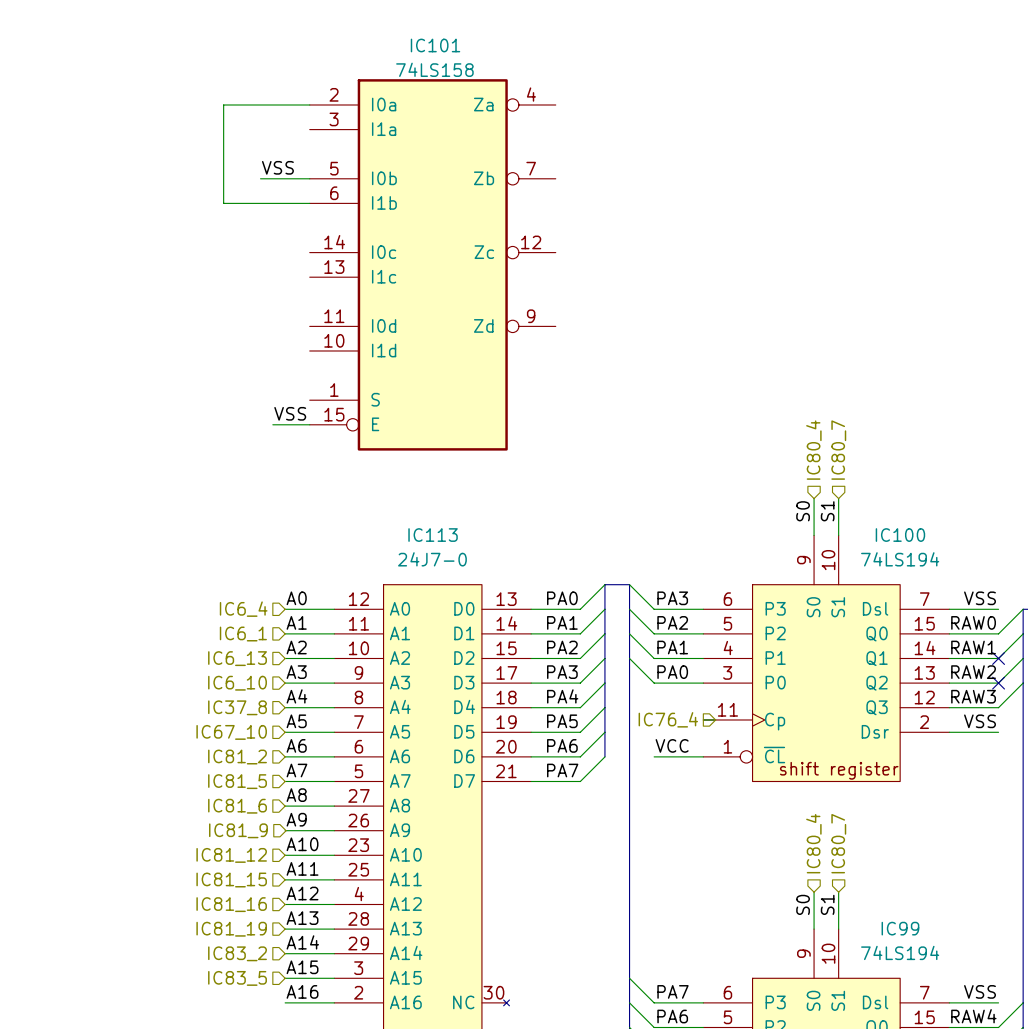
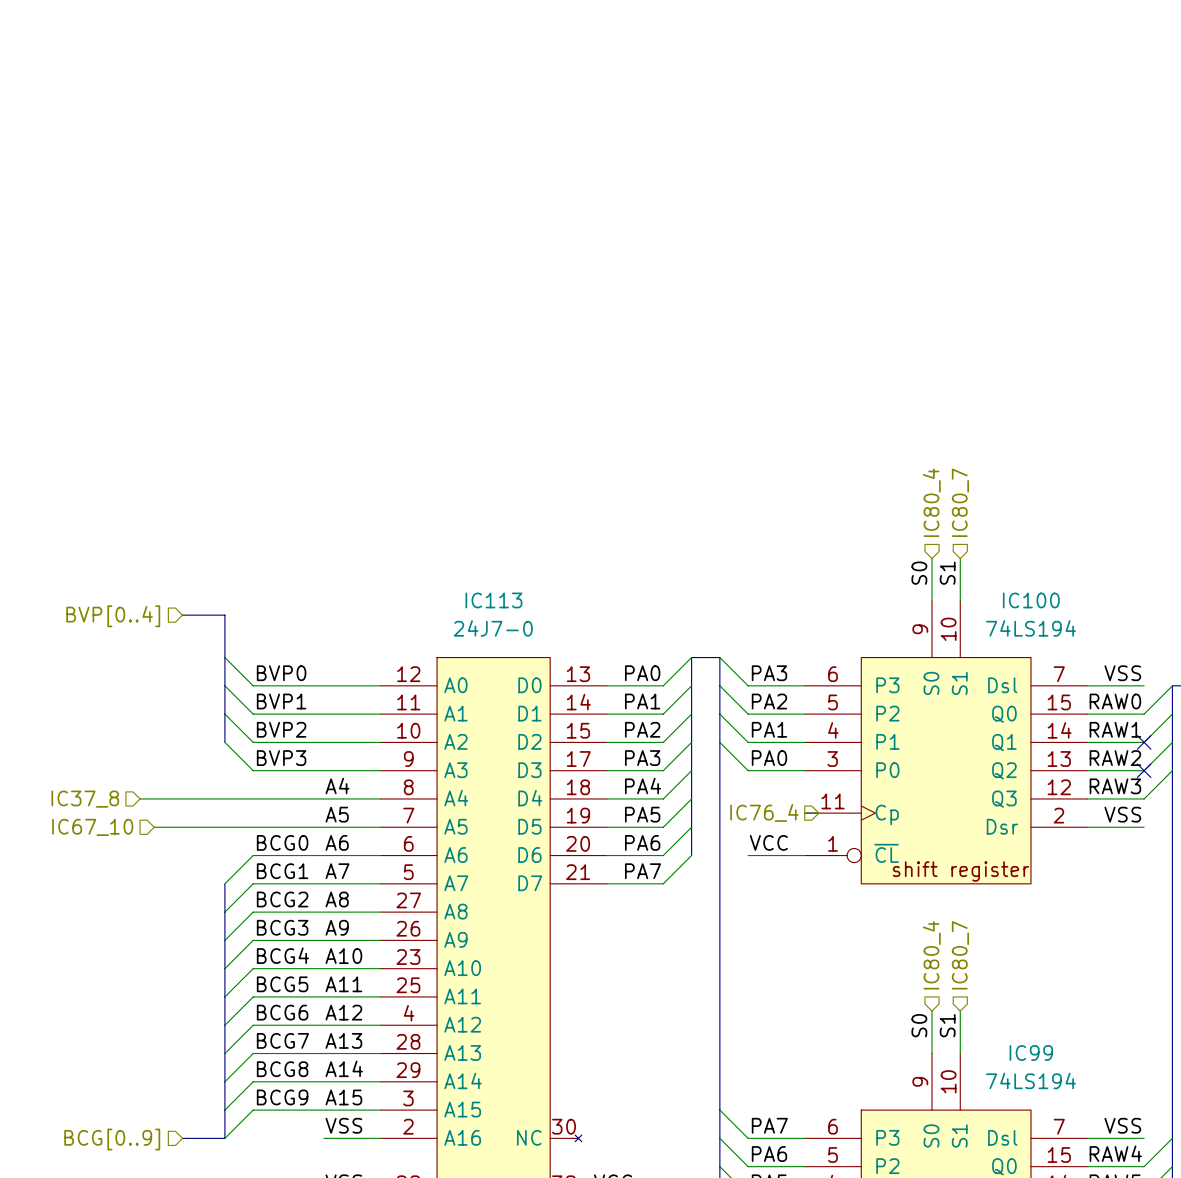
wire: (309, 104) (223, 104) (223, 203) (309, 203) -> none
label: VSS (277, 167) -> none
wire: (260, 178) (309, 178) -> none
IC101: 74LS158 (432, 264) -> none
label: VSS (290, 413) -> none
wire: (272, 424) (309, 424) -> none
bus: none -> (182, 615) (224, 615) (224, 742)
hierarchical label: none -> BVP[0..4] (113, 616)
wire: none -> (224, 657) (253, 685) (323, 685)
label: none -> BVP0 (281, 673)
label: A0 (296, 598) -> none
wire: none -> (224, 685) (253, 714) (323, 714)
hierarchical label: IC6_4 (243, 609) -> none
label: none -> BVP1 (281, 701)
label: A1 (296, 622) -> none
wire: none -> (224, 714) (253, 742) (323, 742)
hierarchical label: IC6_1 (243, 634) -> none
label: none -> BVP2 (281, 729)
label: A2 (296, 647) -> none
wire: none -> (224, 742) (253, 770) (323, 770)
hierarchical label: IC6_13 (237, 658) -> none
label: none -> BVP3 (281, 758)
label: A3 (296, 672) -> none
hierarchical label: IC6_10 (237, 683) -> none
wire: none -> (140, 798) (323, 798)
hierarchical label position: IC37_8 (237, 707) -> IC37_8 (85, 799)
wire: none -> (154, 827) (323, 827)
hierarchical label position: IC67_10 (231, 732) -> IC67_10 (92, 827)
label: none -> BCG0 (282, 842)
wire: none -> (323, 855) (253, 855) (224, 883)
hierarchical label: IC81_2 (237, 757) -> none
label: none -> BCG1 (282, 871)
bus: none -> (224, 883) (224, 1138) (182, 1138)
hierarchical label: IC81_5 (237, 781) -> none
wire: none -> (323, 883) (253, 883) (224, 912)
label: none -> BCG2 (282, 899)
hierarchical label: IC81_6 (237, 806) -> none
wire: none -> (323, 912) (253, 912) (224, 940)
label: none -> BCG3 (282, 927)
hierarchical label: IC81_9 (238, 830) -> none
wire: none -> (323, 940) (253, 940) (224, 968)
label: none -> BCG4 (282, 955)
hierarchical label: IC81_12 (231, 855) -> none
wire: none -> (323, 968) (253, 968) (224, 996)
label: none -> BCG5 (282, 984)
wire: none -> (323, 996) (253, 996) (224, 1025)
hierarchical label: IC81_15 (231, 880) -> none
label: none -> BCG6 (282, 1012)
hierarchical label: IC81_16 (231, 904) -> none
wire: none -> (323, 1025) (253, 1025) (224, 1053)
label: none -> BCG7 (282, 1040)
hierarchical label: IC81_19 (231, 929) -> none
wire: none -> (323, 1053) (253, 1053) (224, 1081)
label: none -> BCG8 (282, 1069)
hierarchical label: IC83_2 (237, 953) -> none
wire: none -> (323, 1081) (253, 1081) (224, 1110)
label: none -> BCG9 (282, 1097)
hierarchical label: IC83_5 (237, 978) -> none
wire: none -> (323, 1110) (253, 1110) (224, 1138)
label: A16 (302, 991) -> VSS (343, 1125)
hierarchical label: none -> BCG[0..9] (112, 1139)

